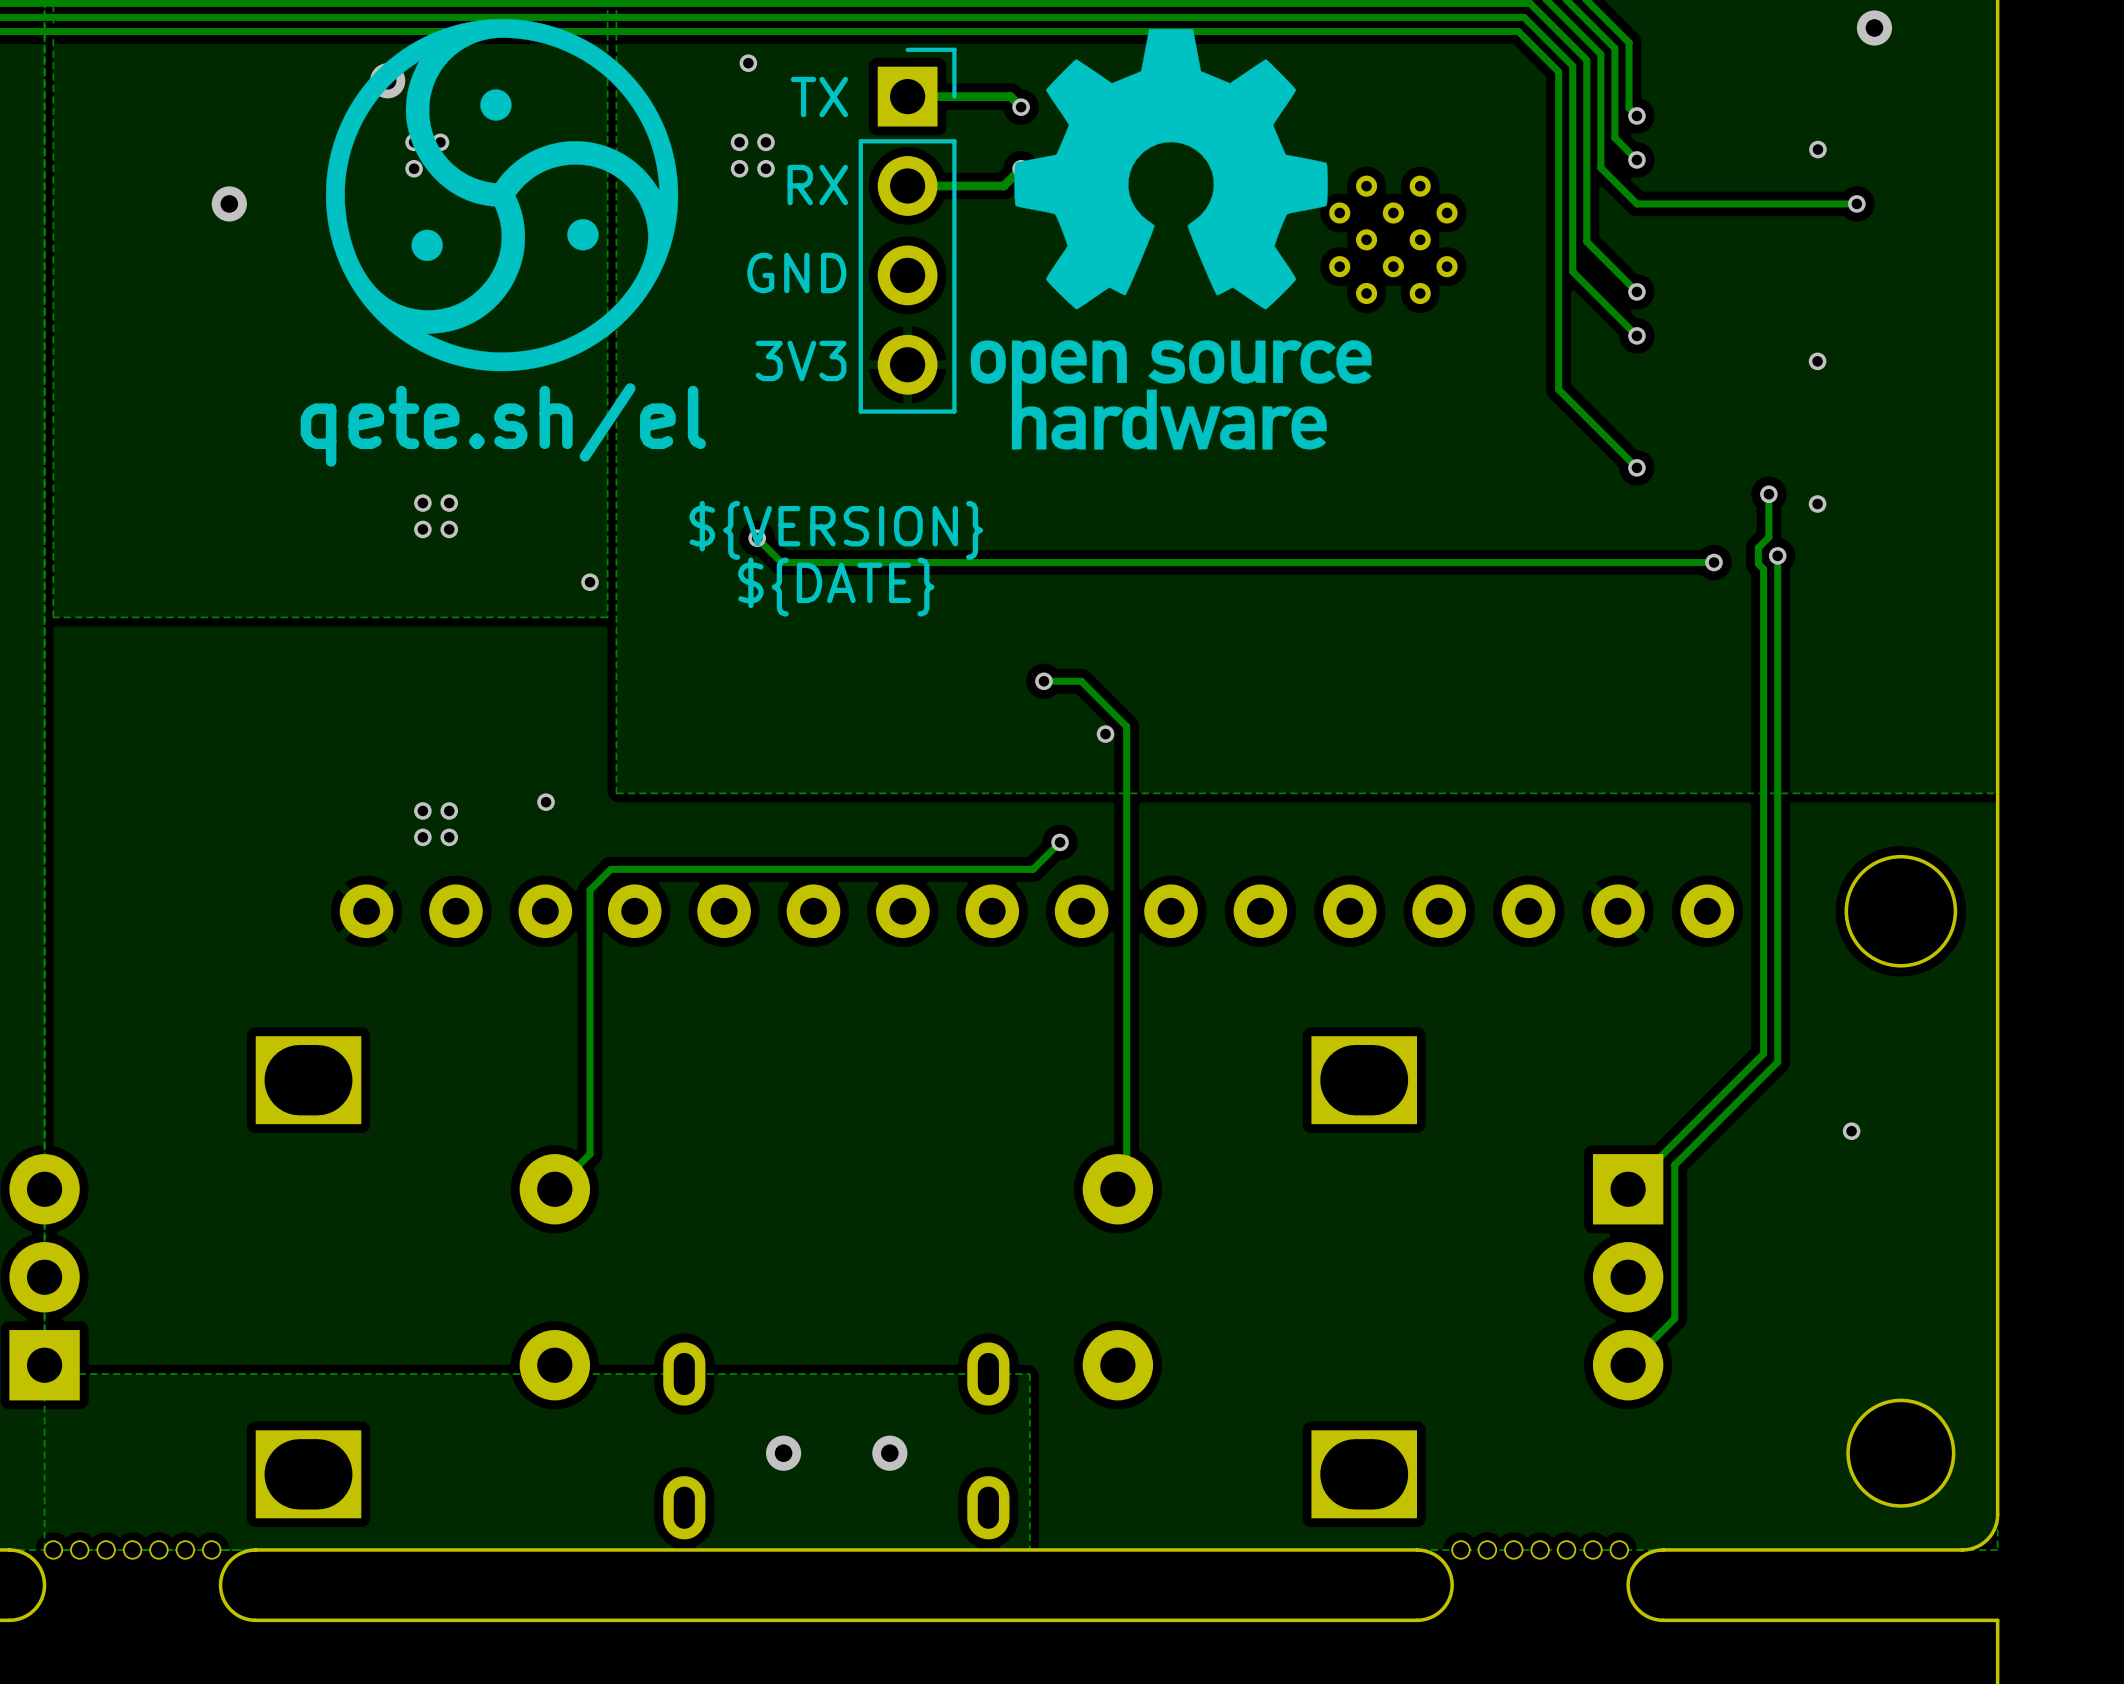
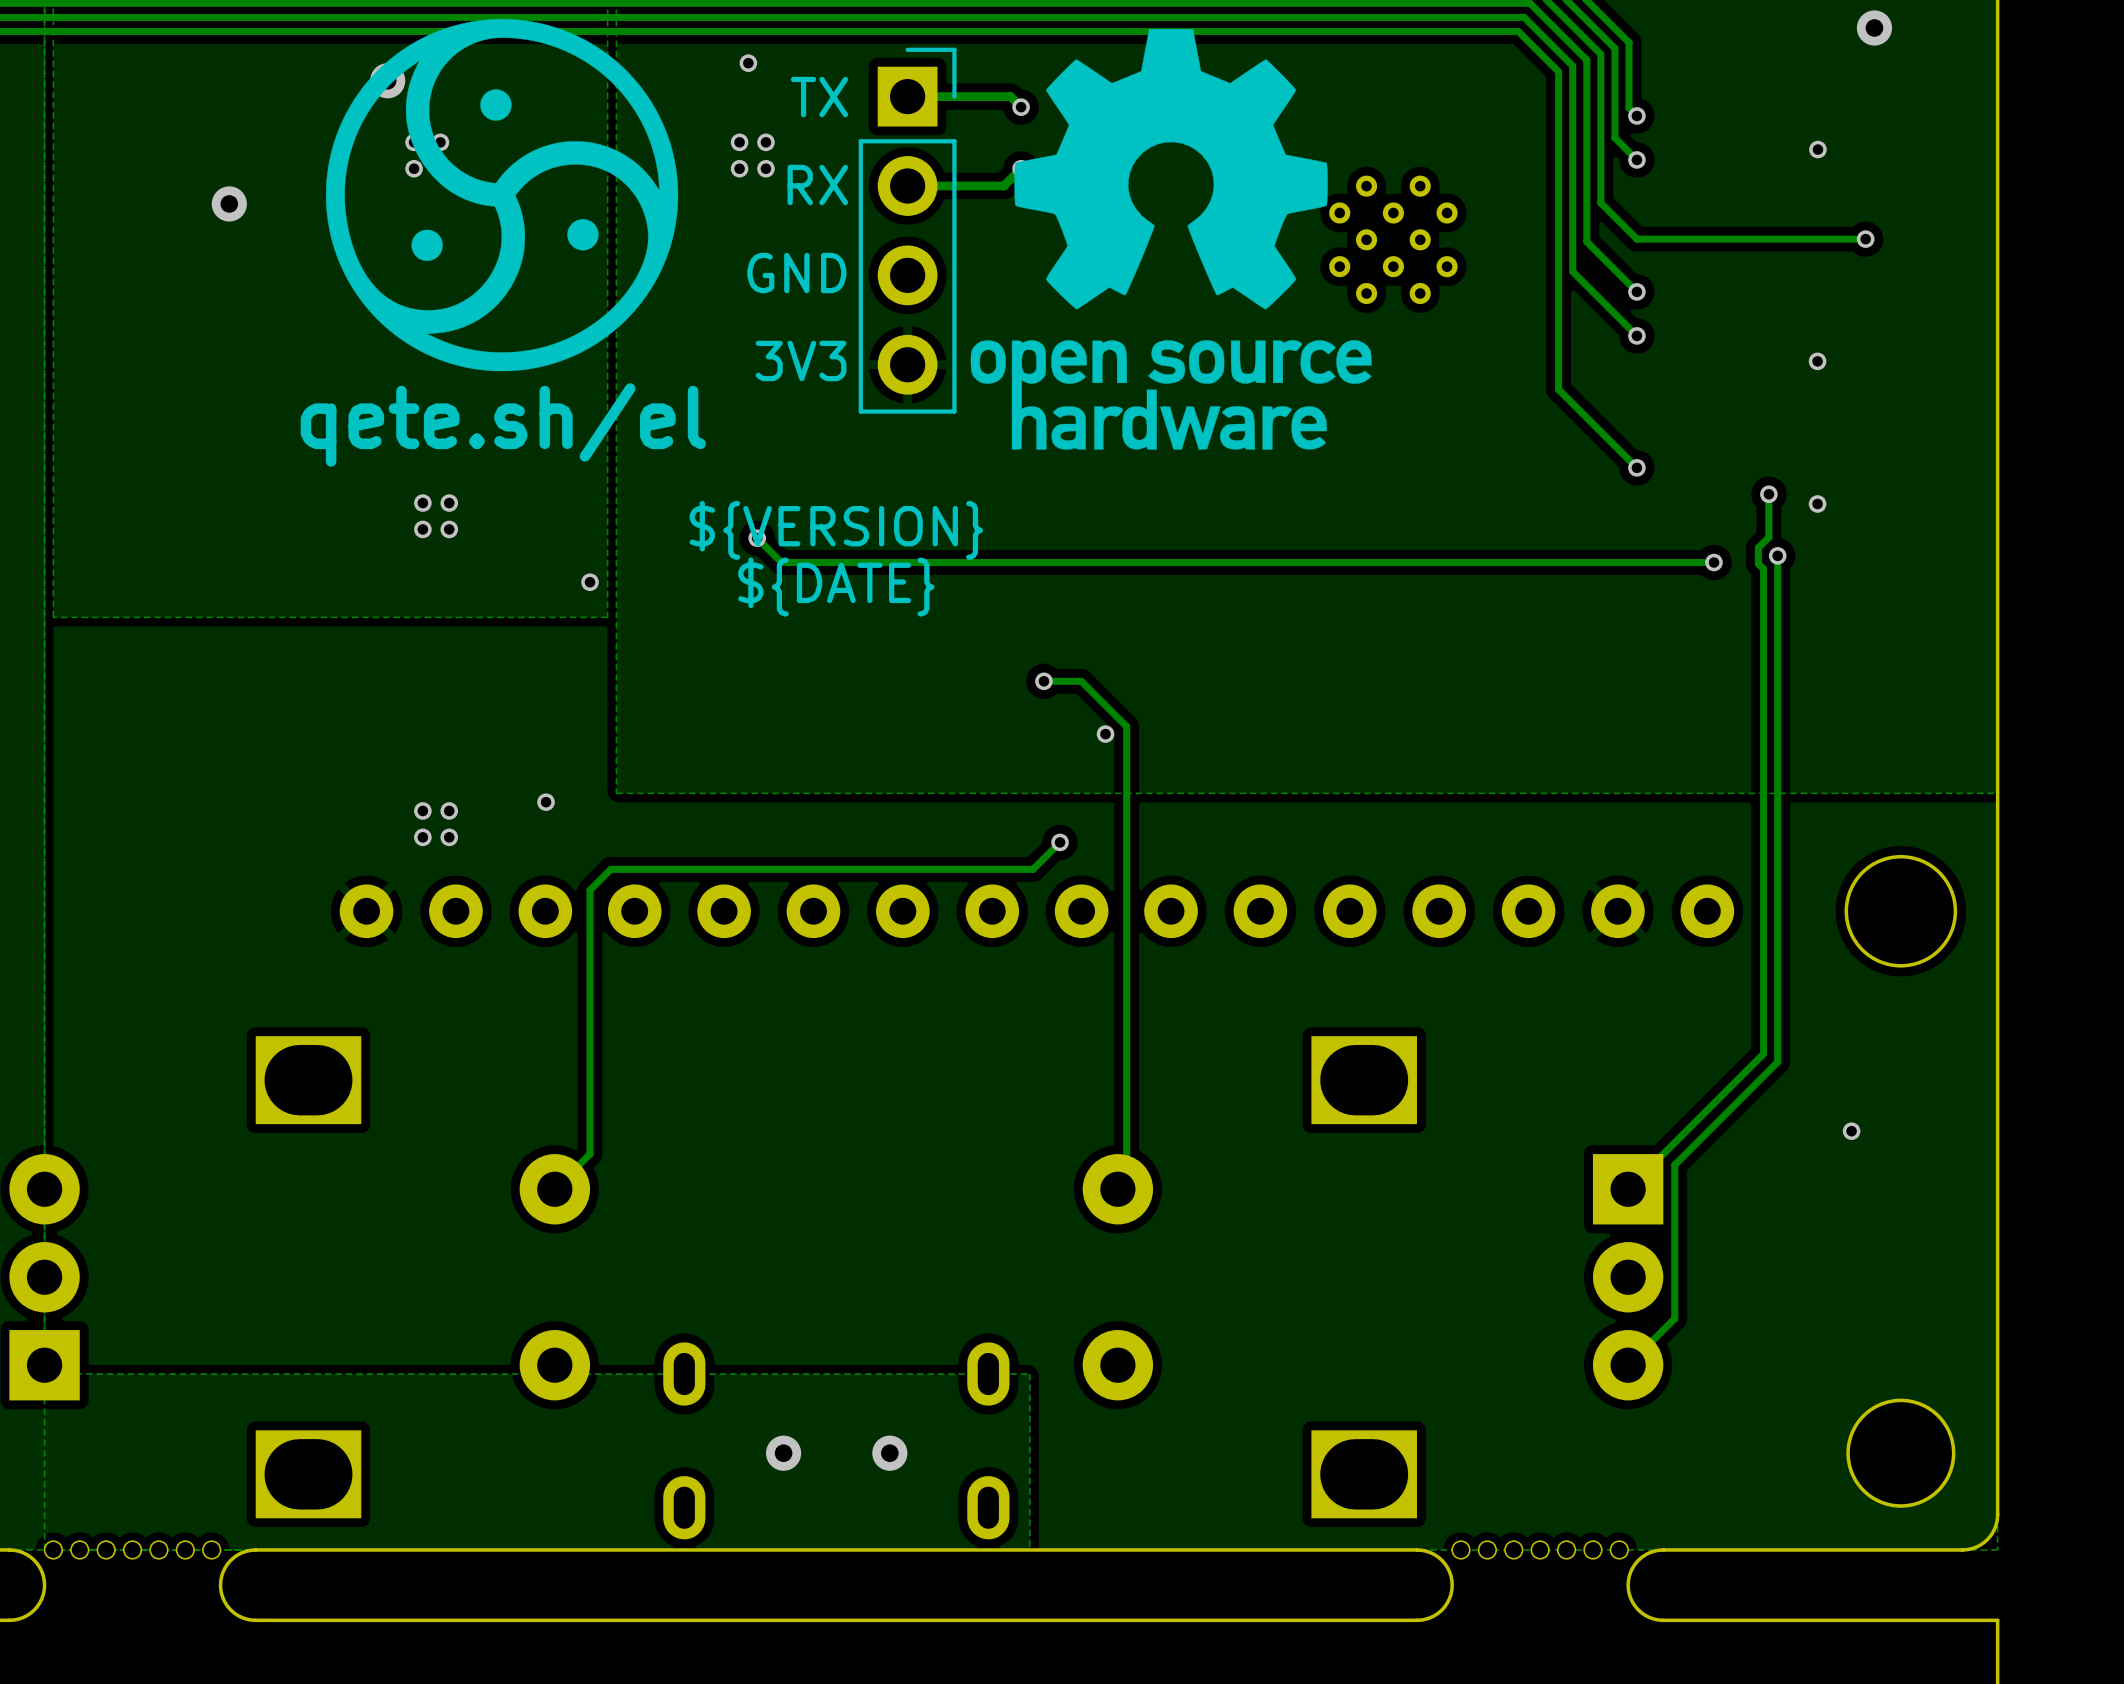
track: (1600, 167) (1636, 203) (1856, 203) -> (1600, 167) (1600, 203) (1636, 239) (1865, 239)
via position: (1856, 203) -> (1865, 239)

